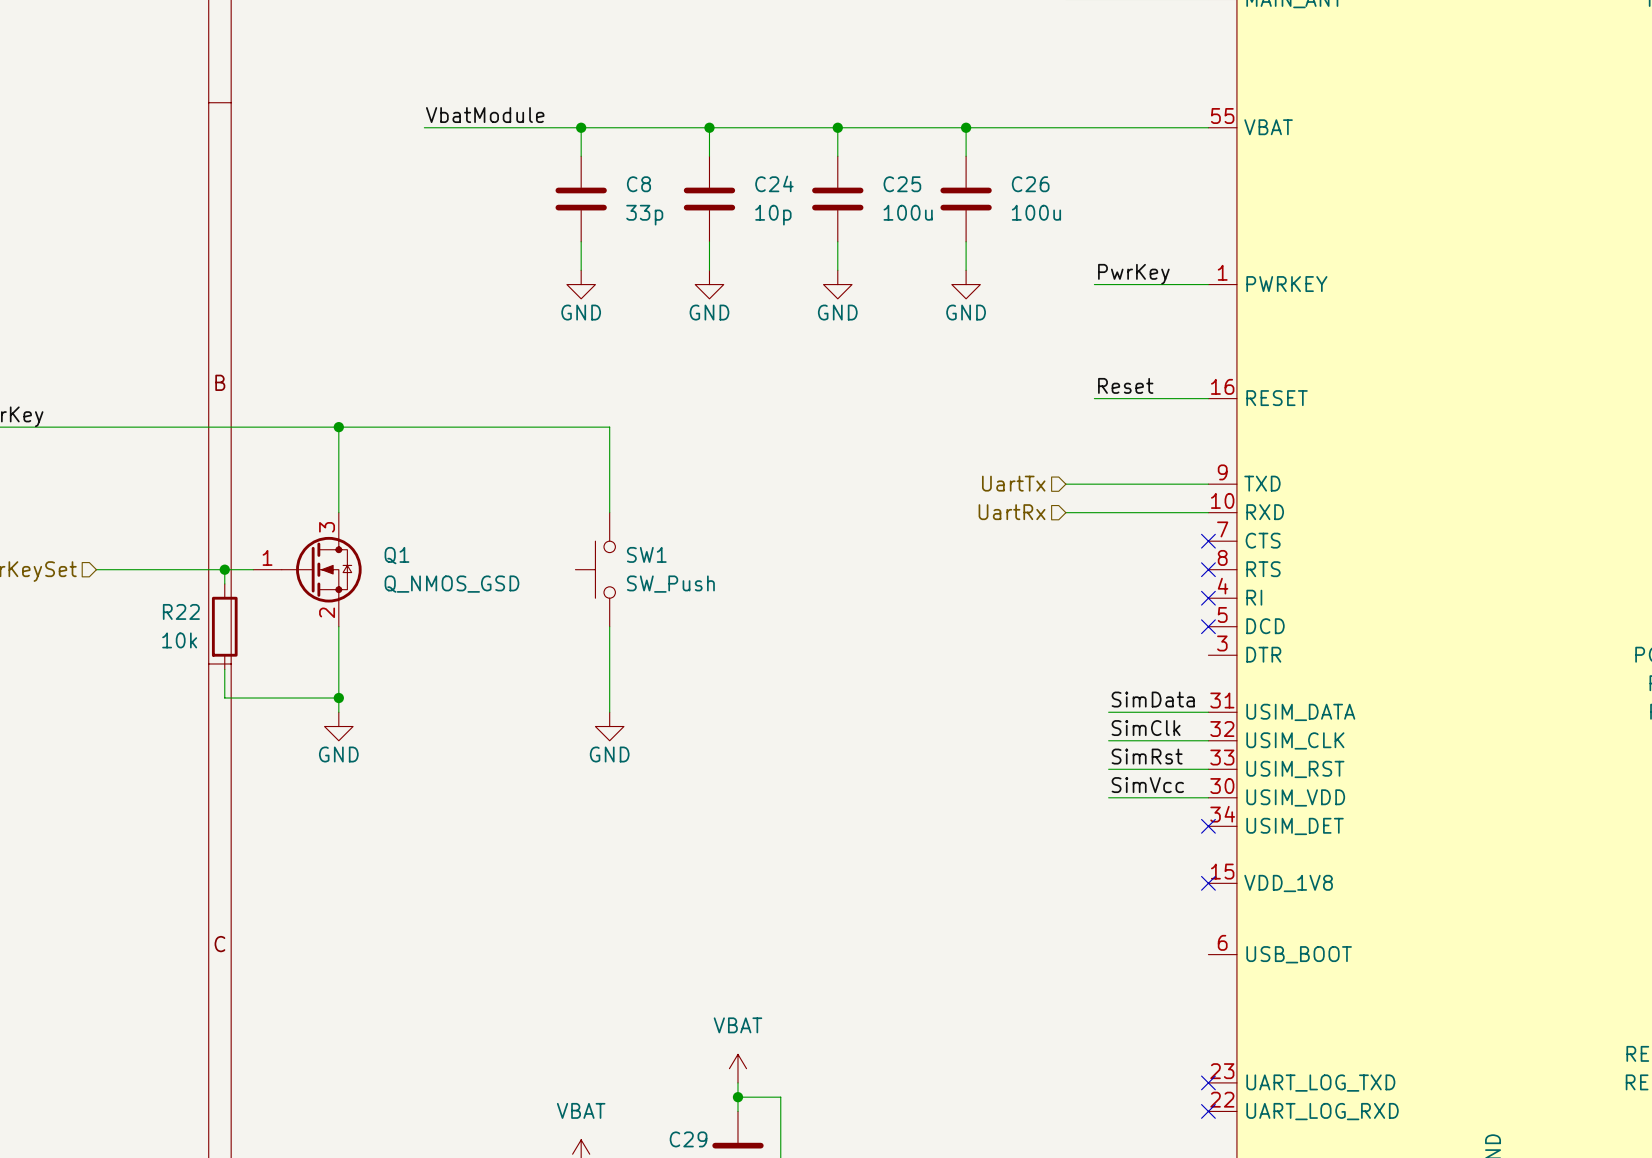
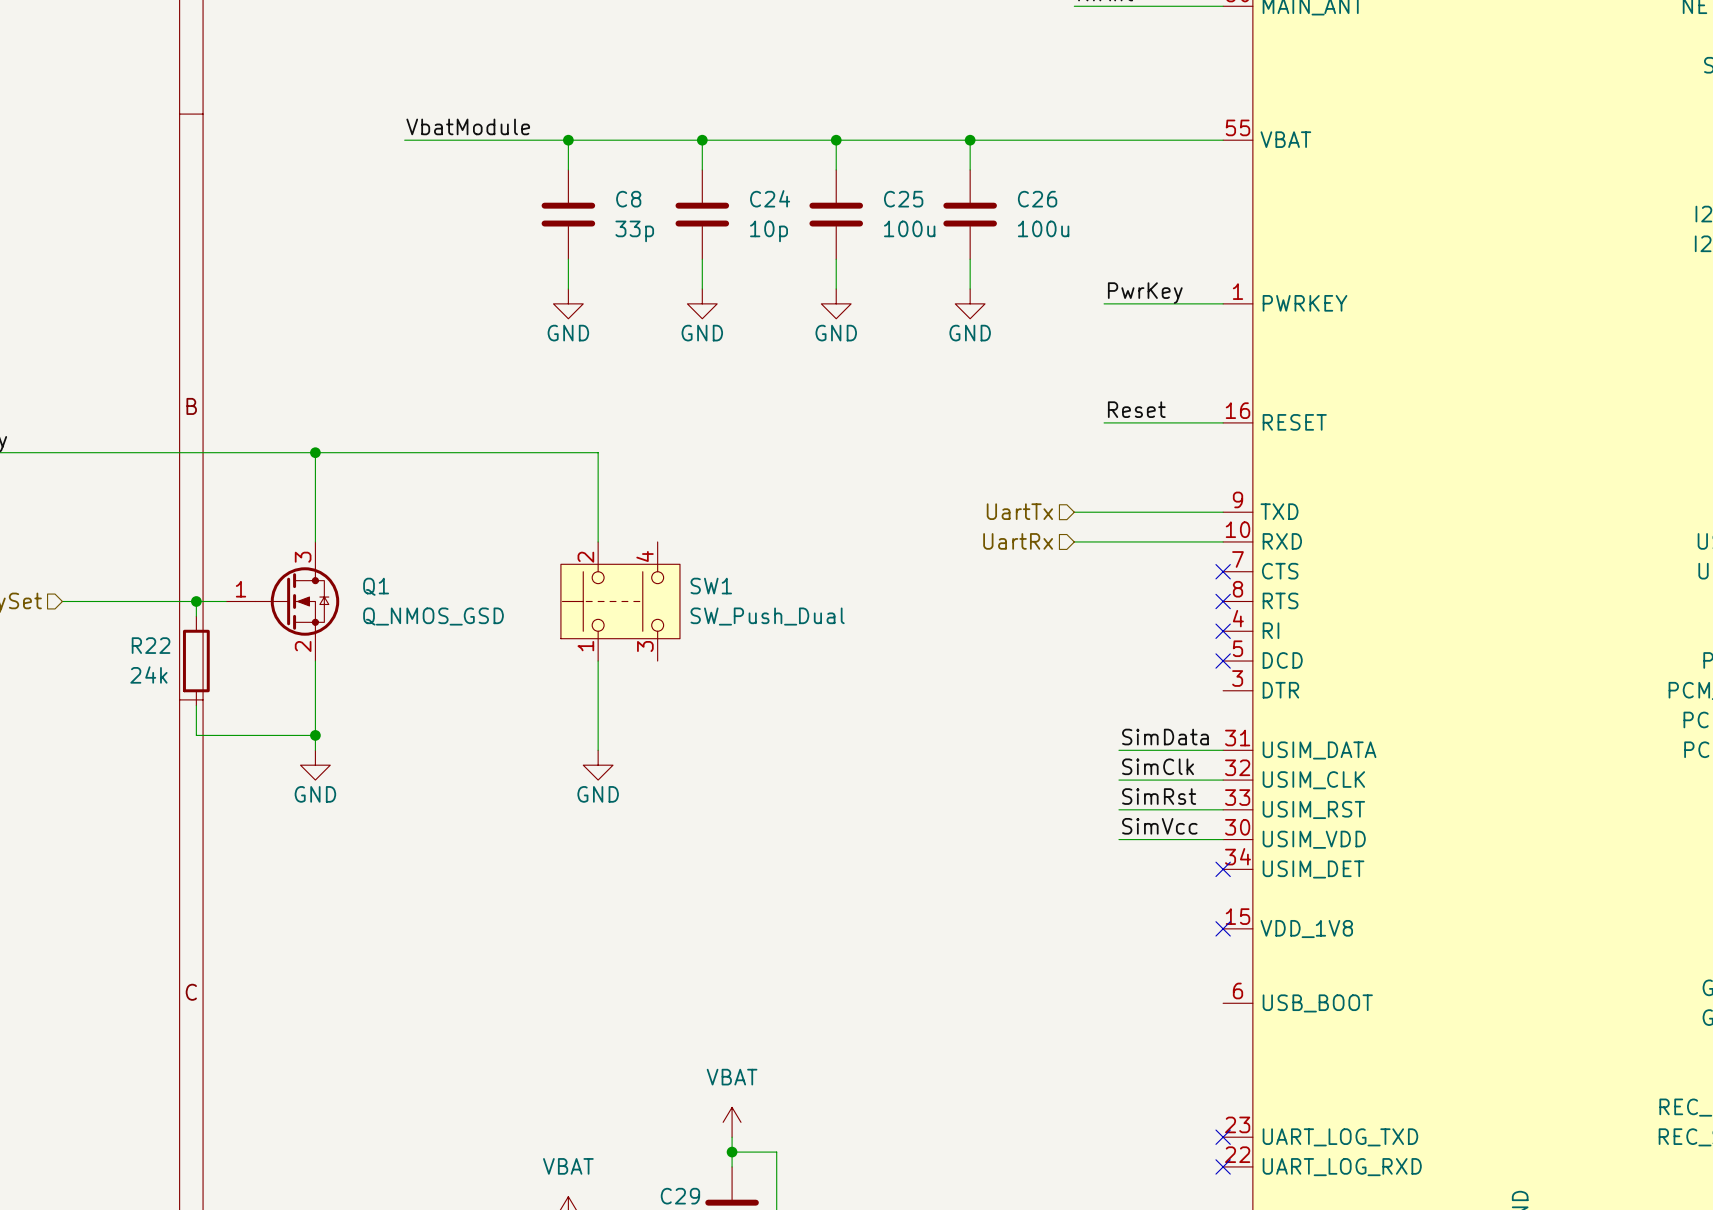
SW1 symbol: [575, 512, 616, 627] -> [560, 541, 680, 662]
SW1 name position: SW1 (646, 554) -> SW1 (711, 586)
SW1 value: SW_Push (670, 584) -> SW_Push_Dual (767, 616)
R22 value: 10k (179, 640) -> 24k (148, 674)

